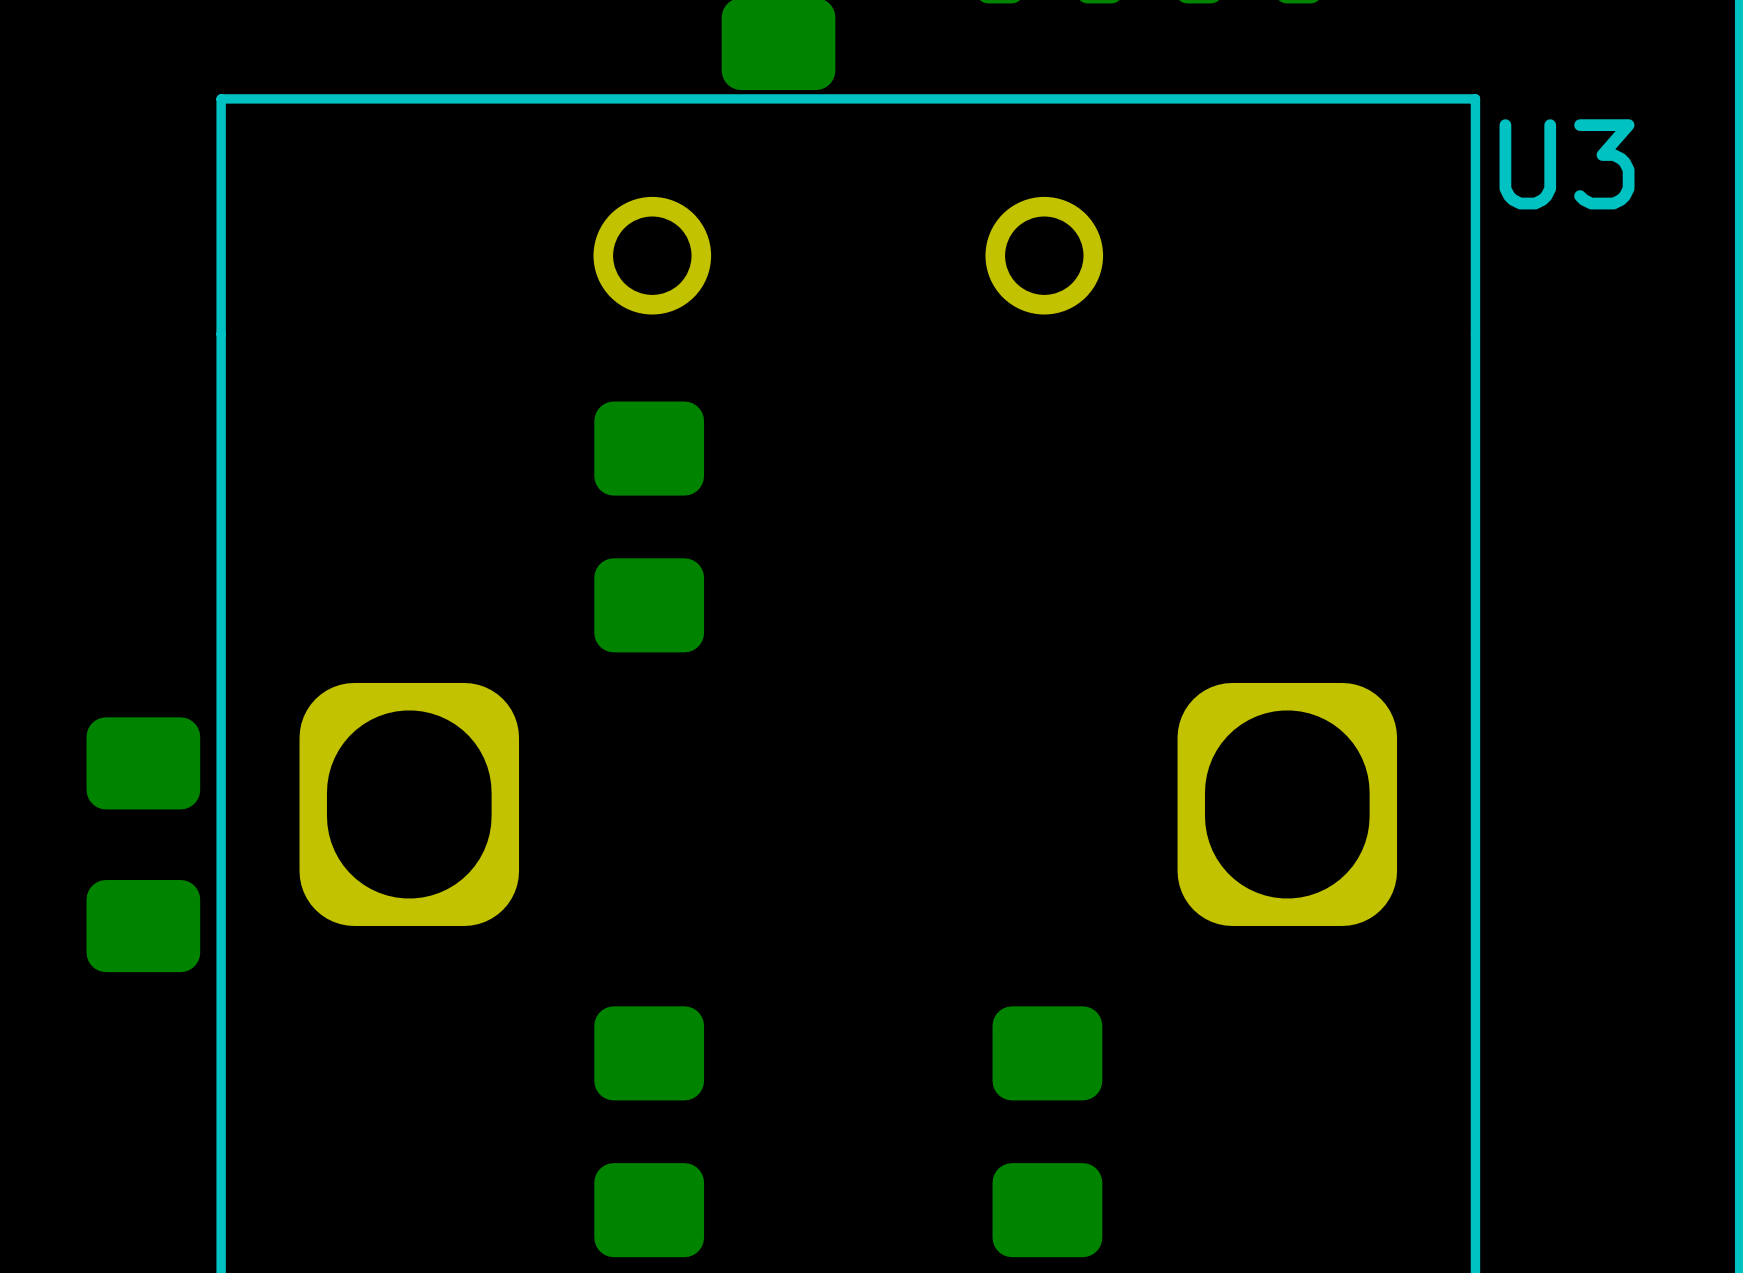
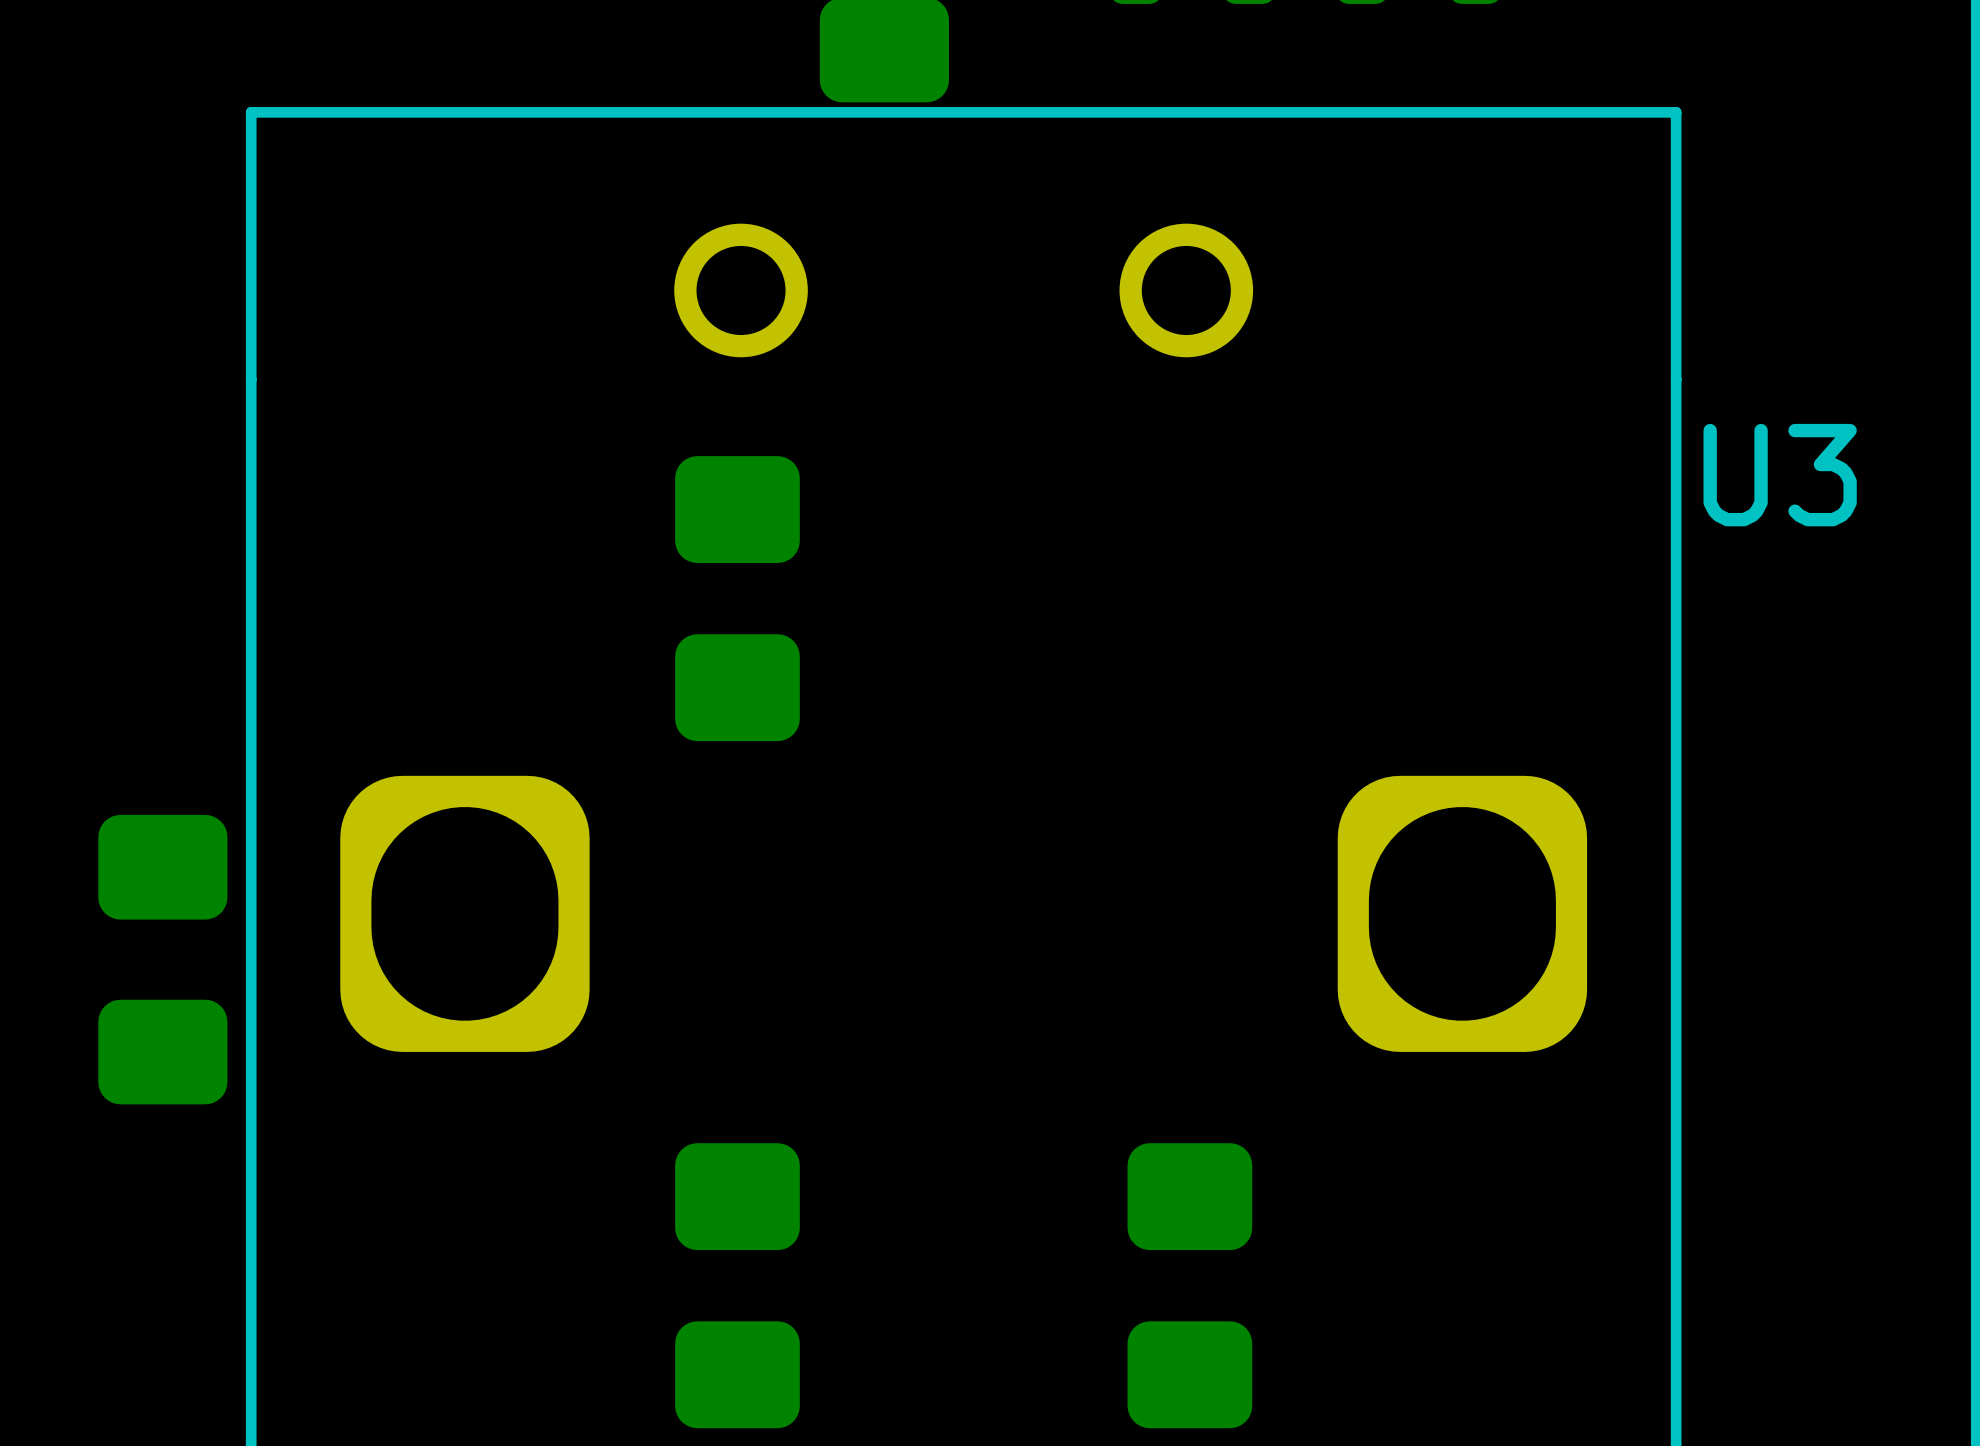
U3 name position: U3 (1567, 164) -> U3 (1780, 475)

